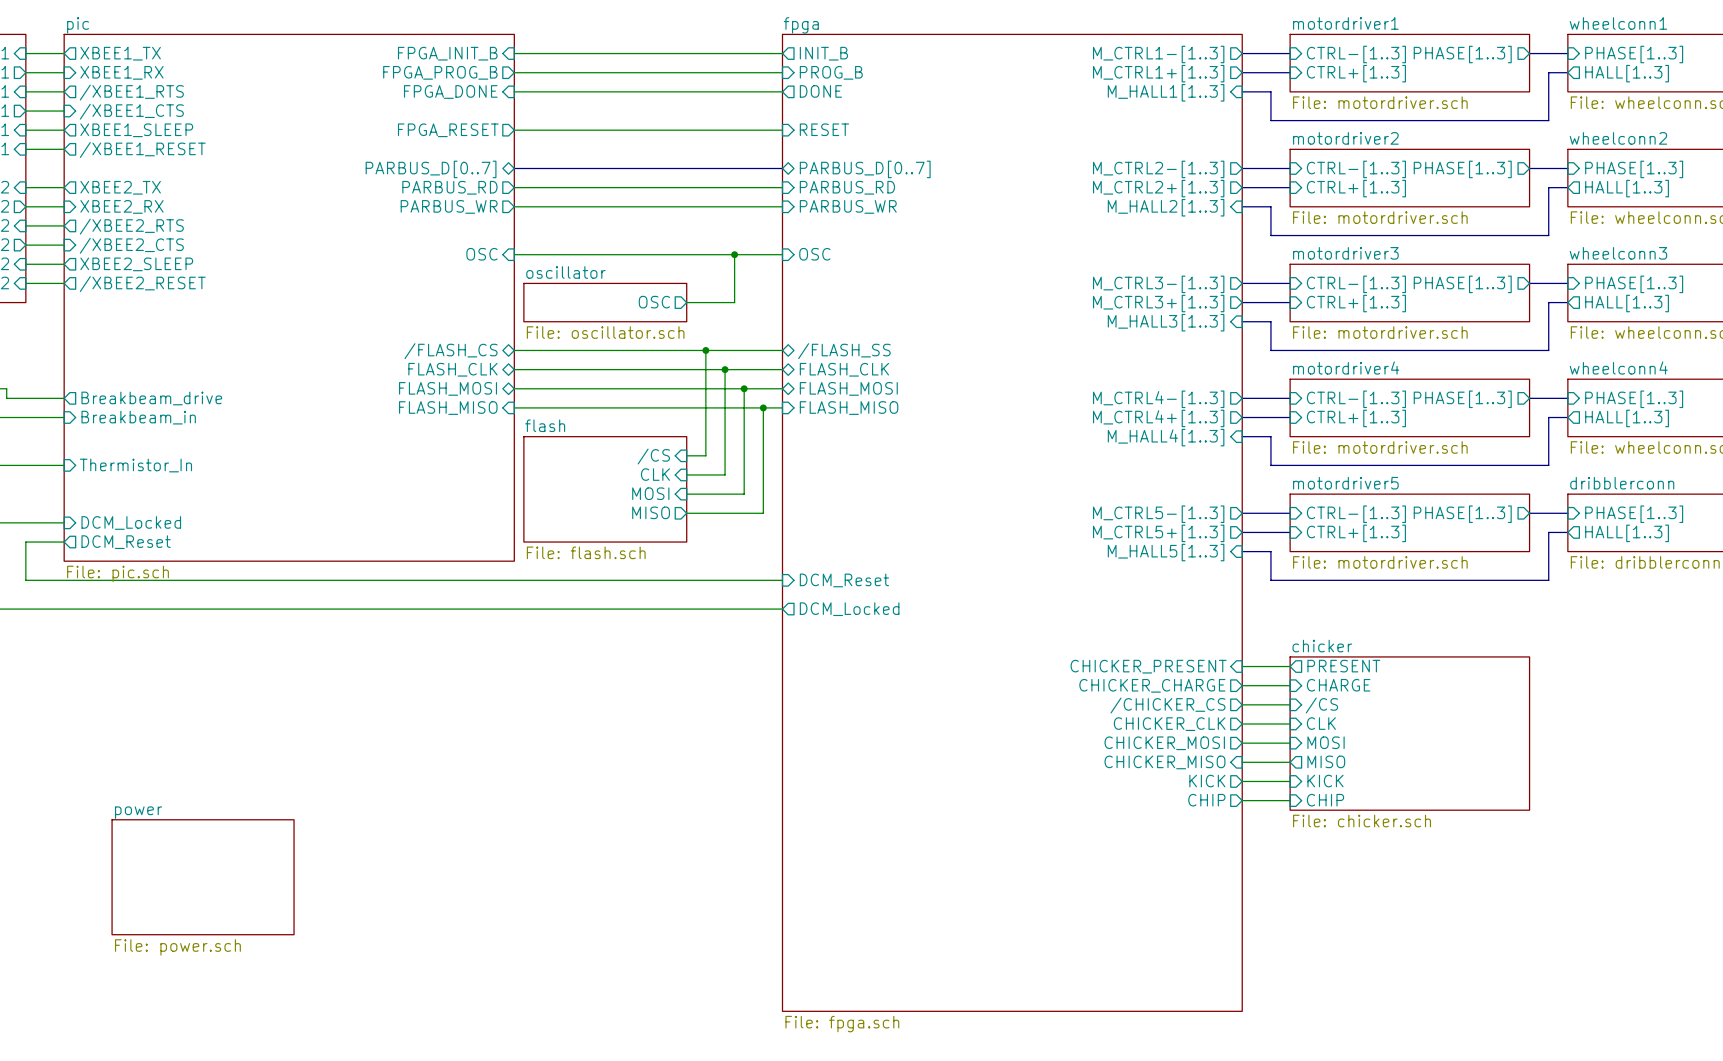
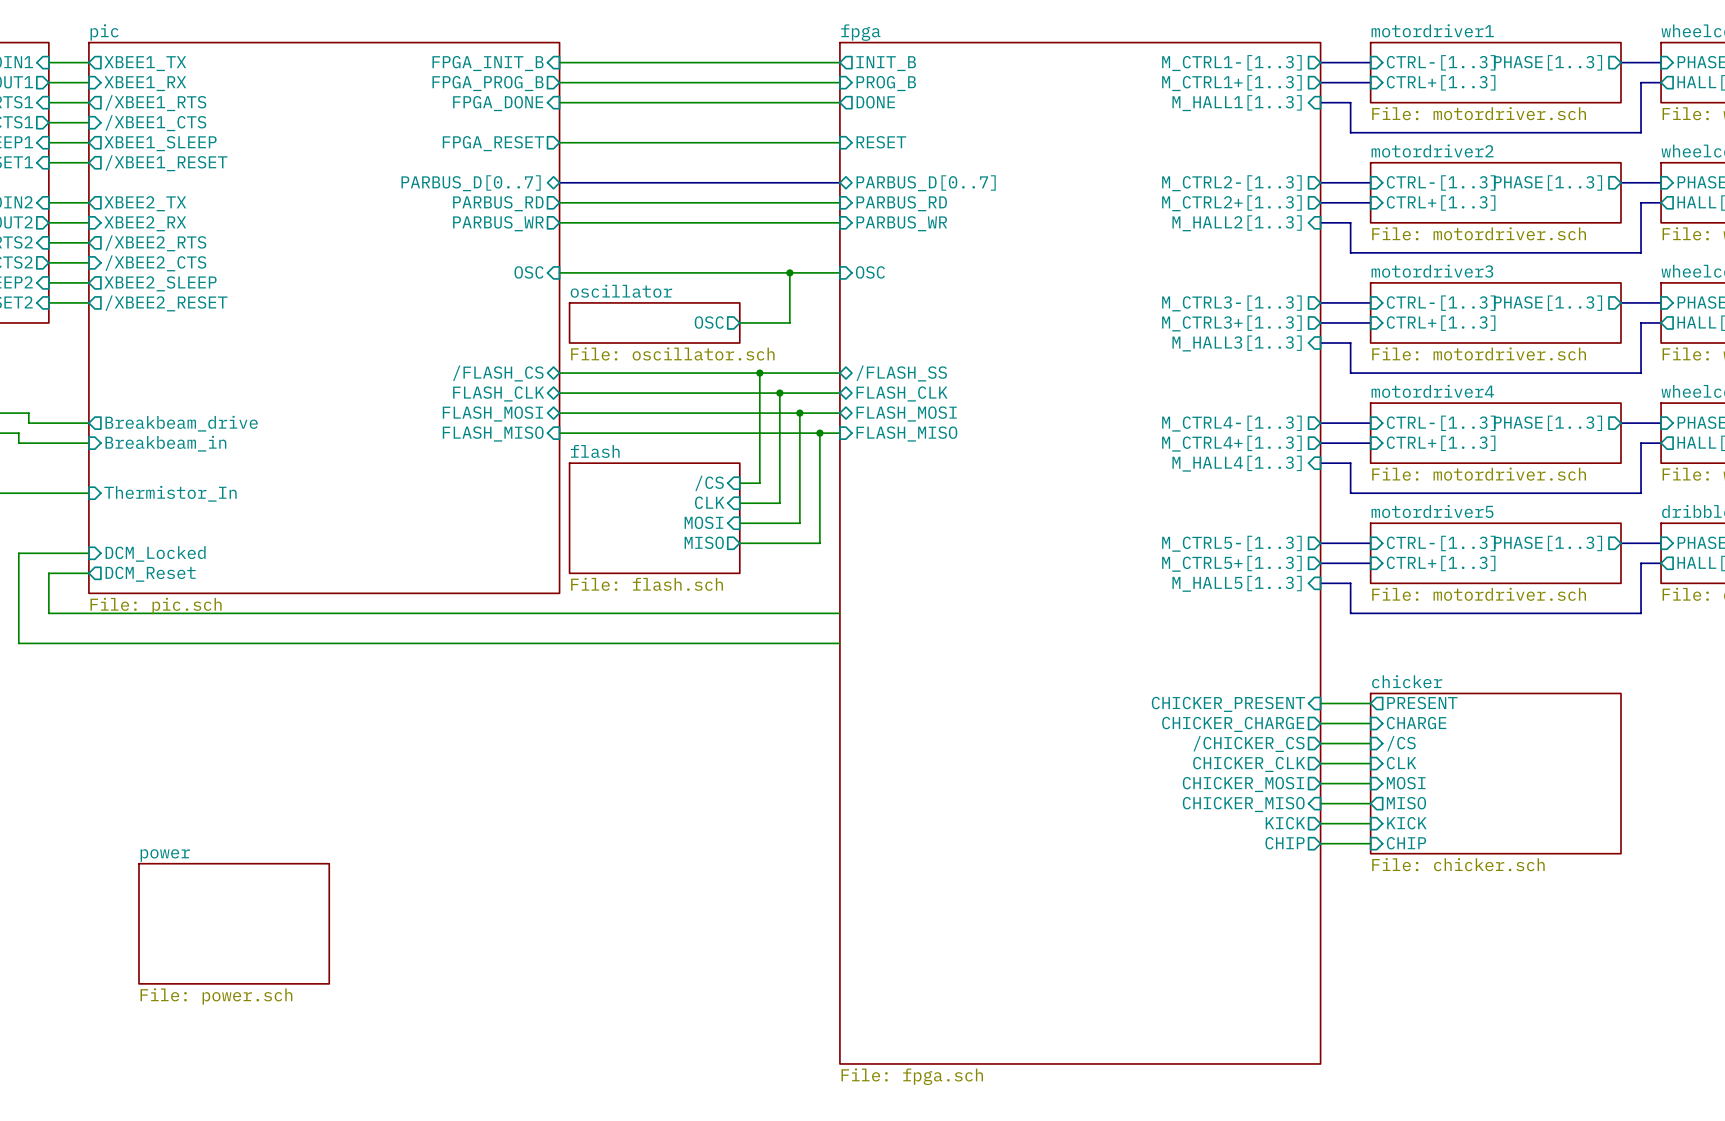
sheet pin: DCM_Reset (844, 580) -> none
sheet pin: DCM_Locked (849, 609) -> none

